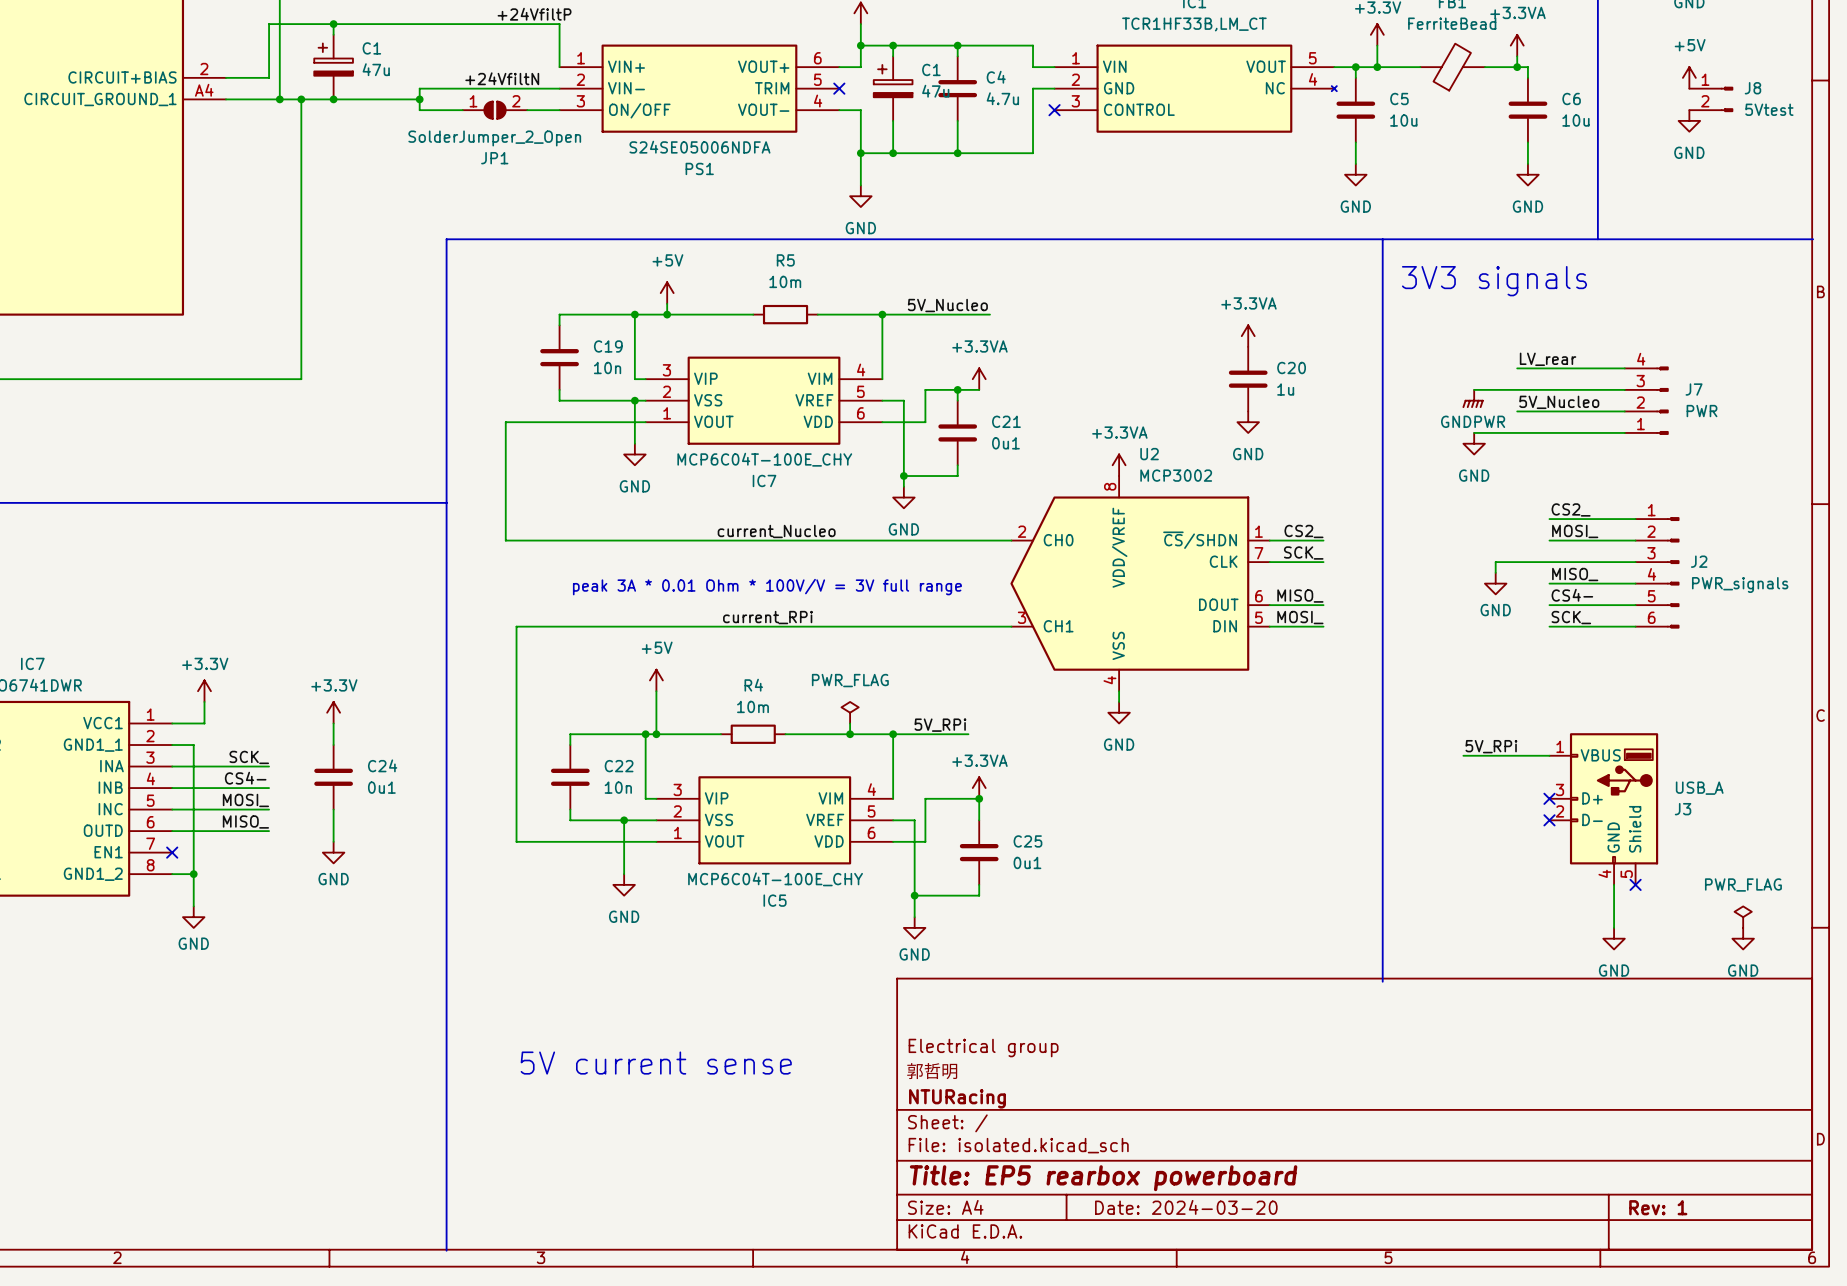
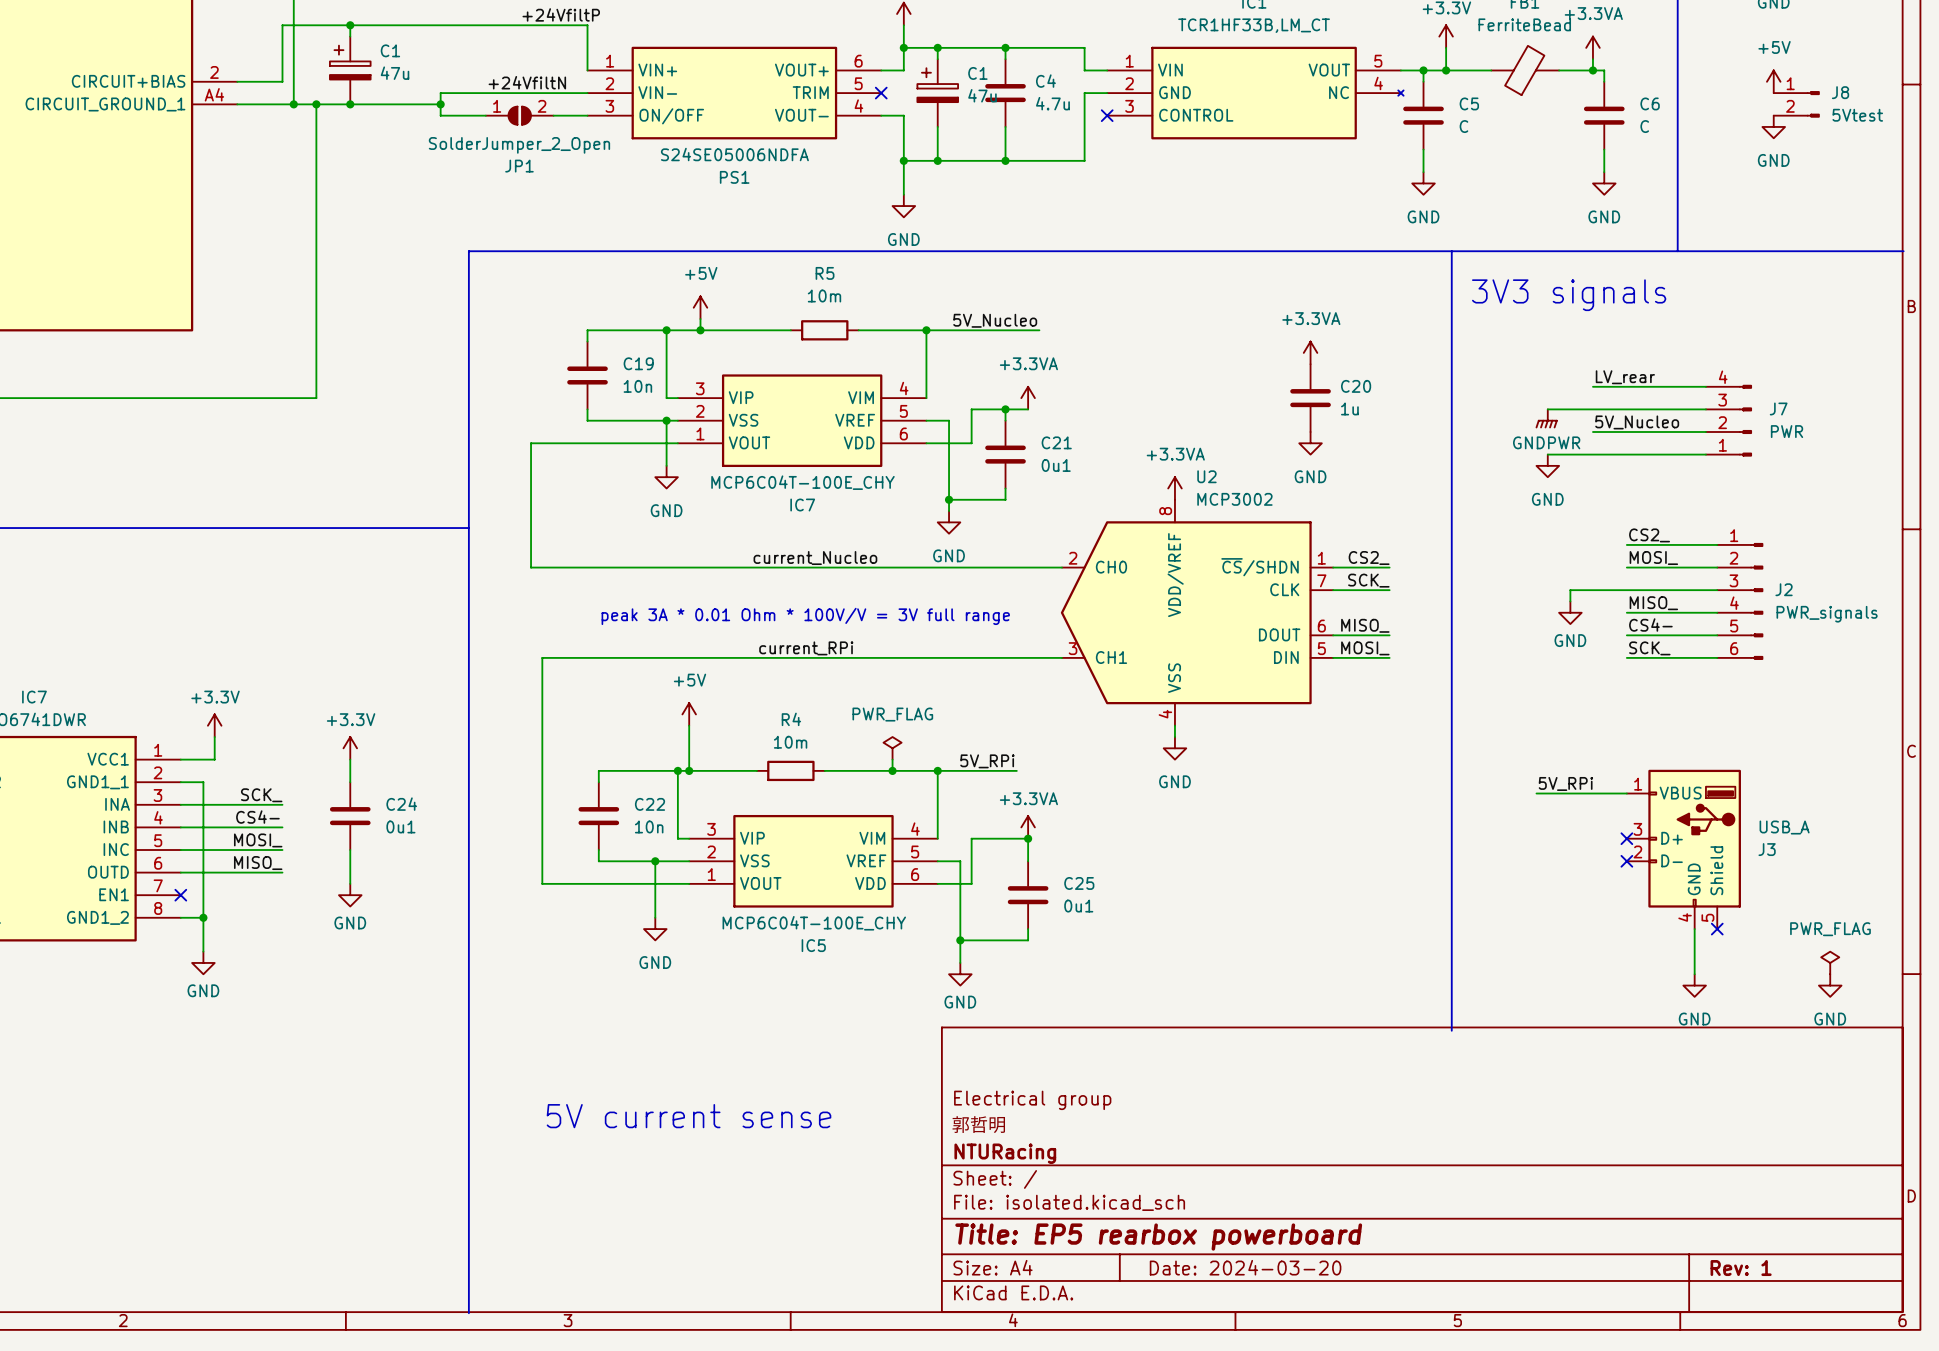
C5 value: 10u (1403, 120) -> C (1463, 126)
C6 value: 10u (1575, 120) -> C (1644, 126)

